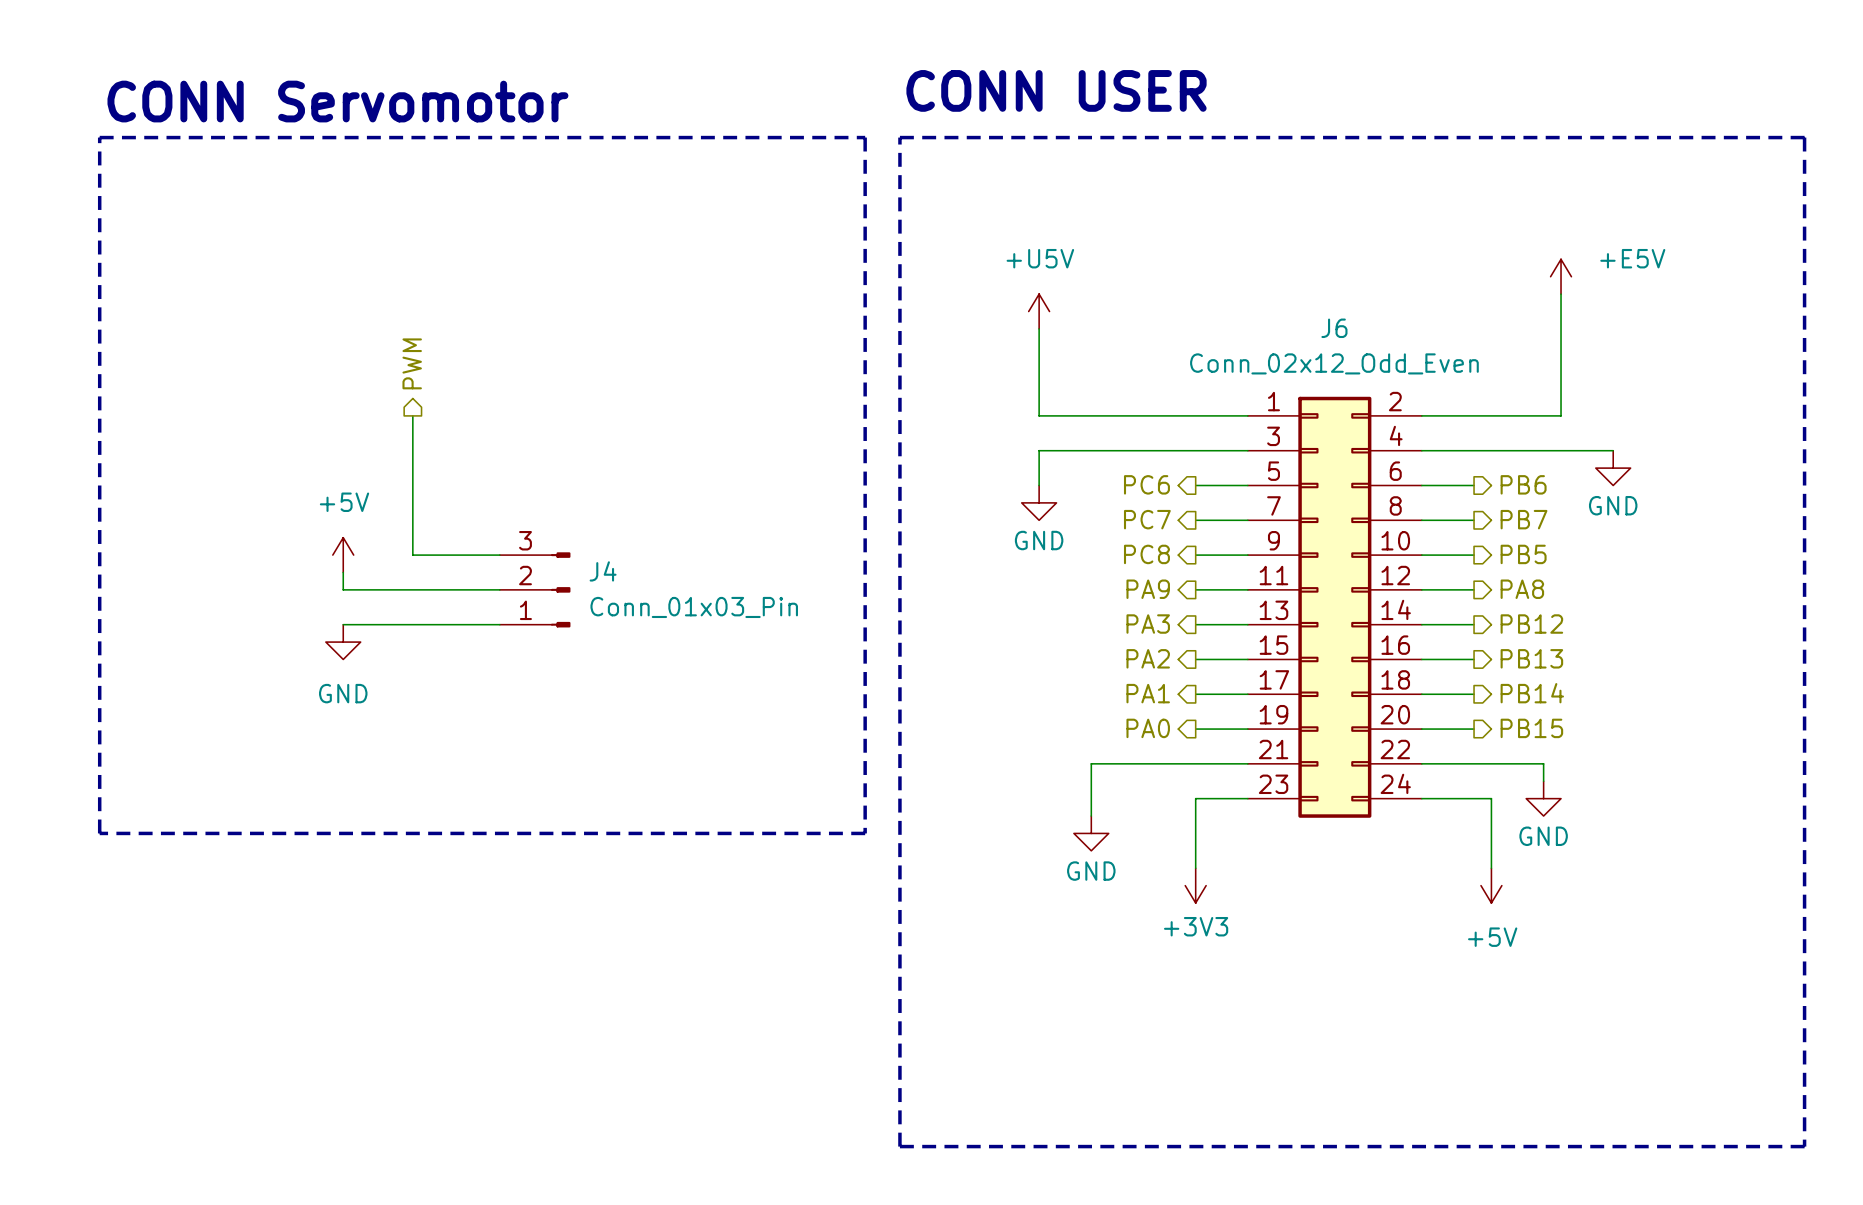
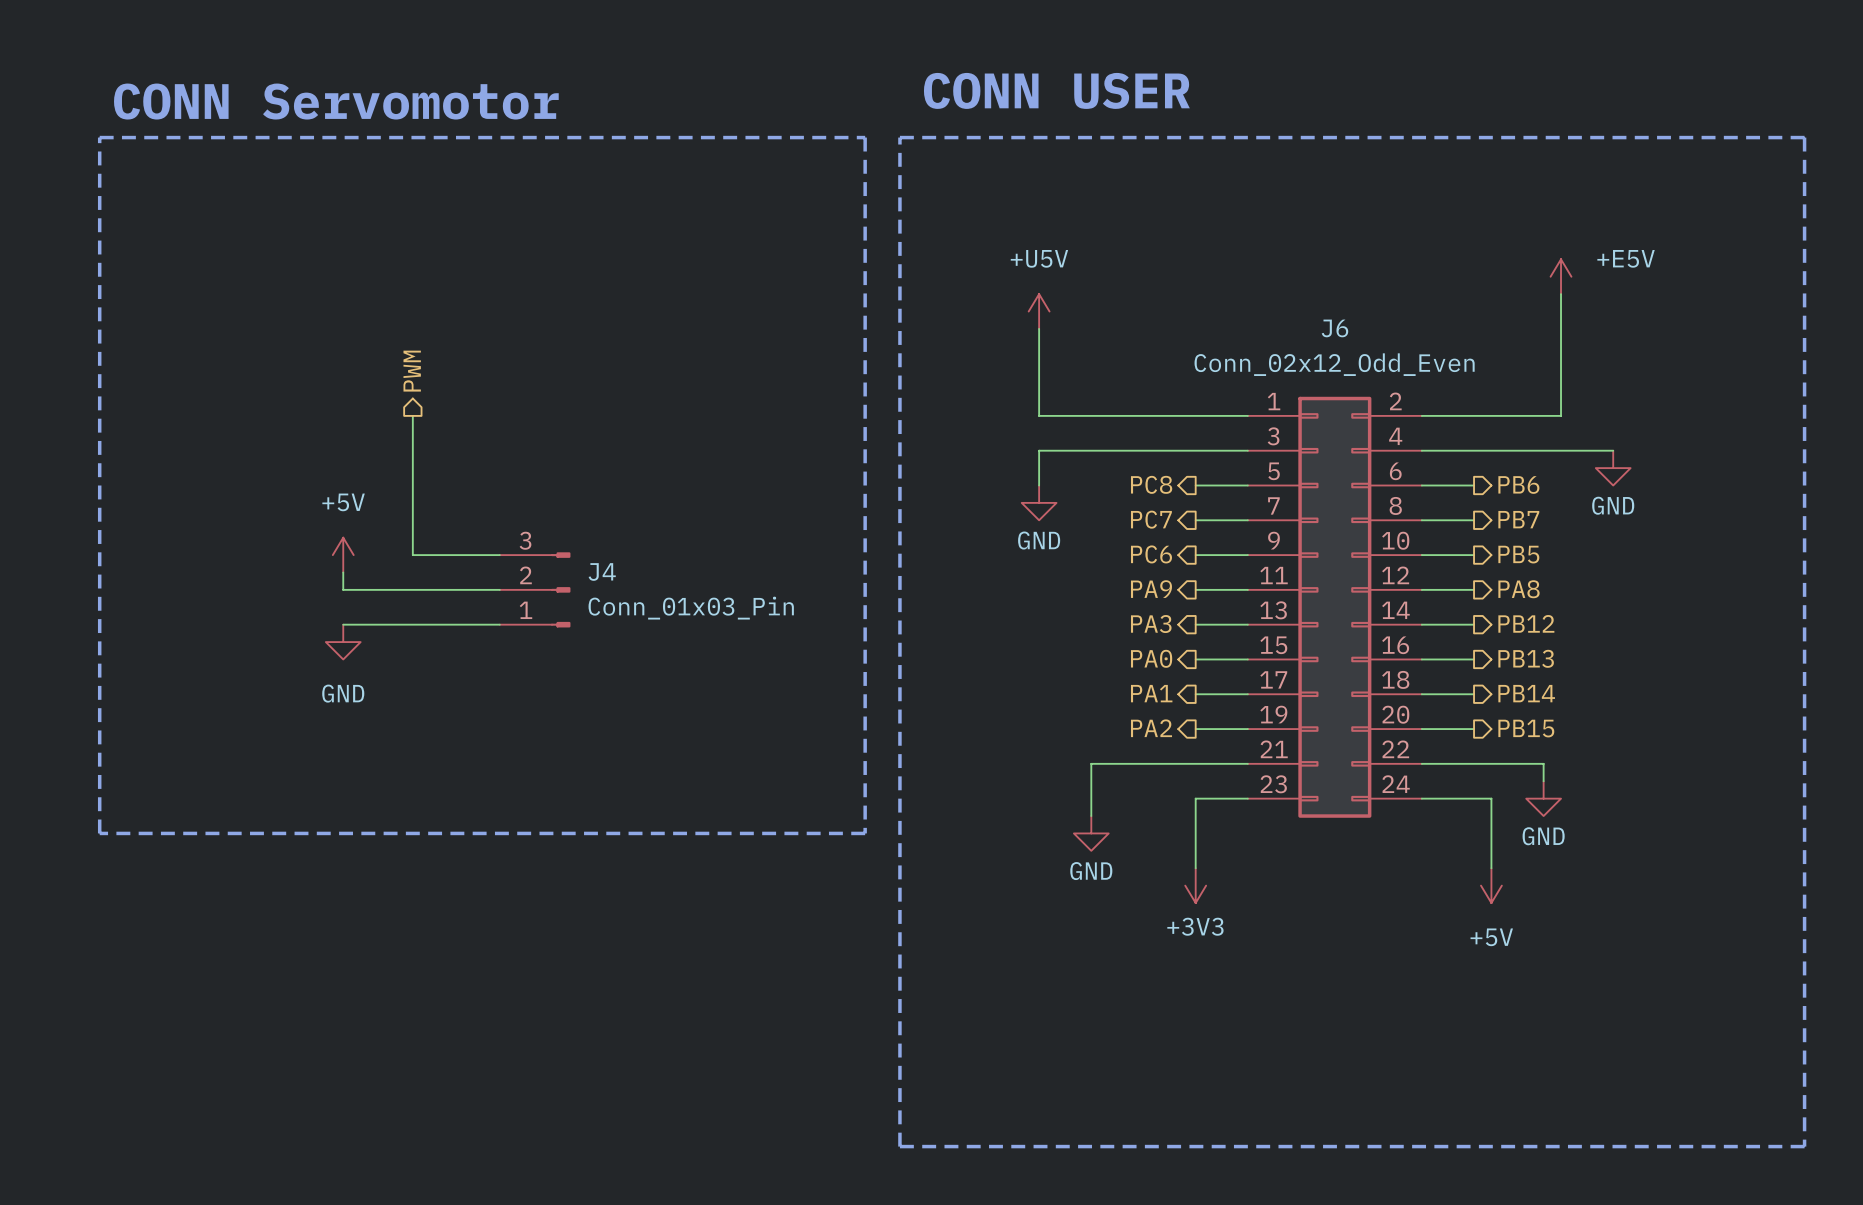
hierarchical label: PC6 (1146, 484) -> PC8 (1151, 484)
hierarchical label: PC8 (1146, 554) -> PC6 (1151, 554)
hierarchical label: PA2 (1148, 658) -> PA0 (1151, 658)
hierarchical label: PA0 (1148, 728) -> PA2 (1151, 728)

